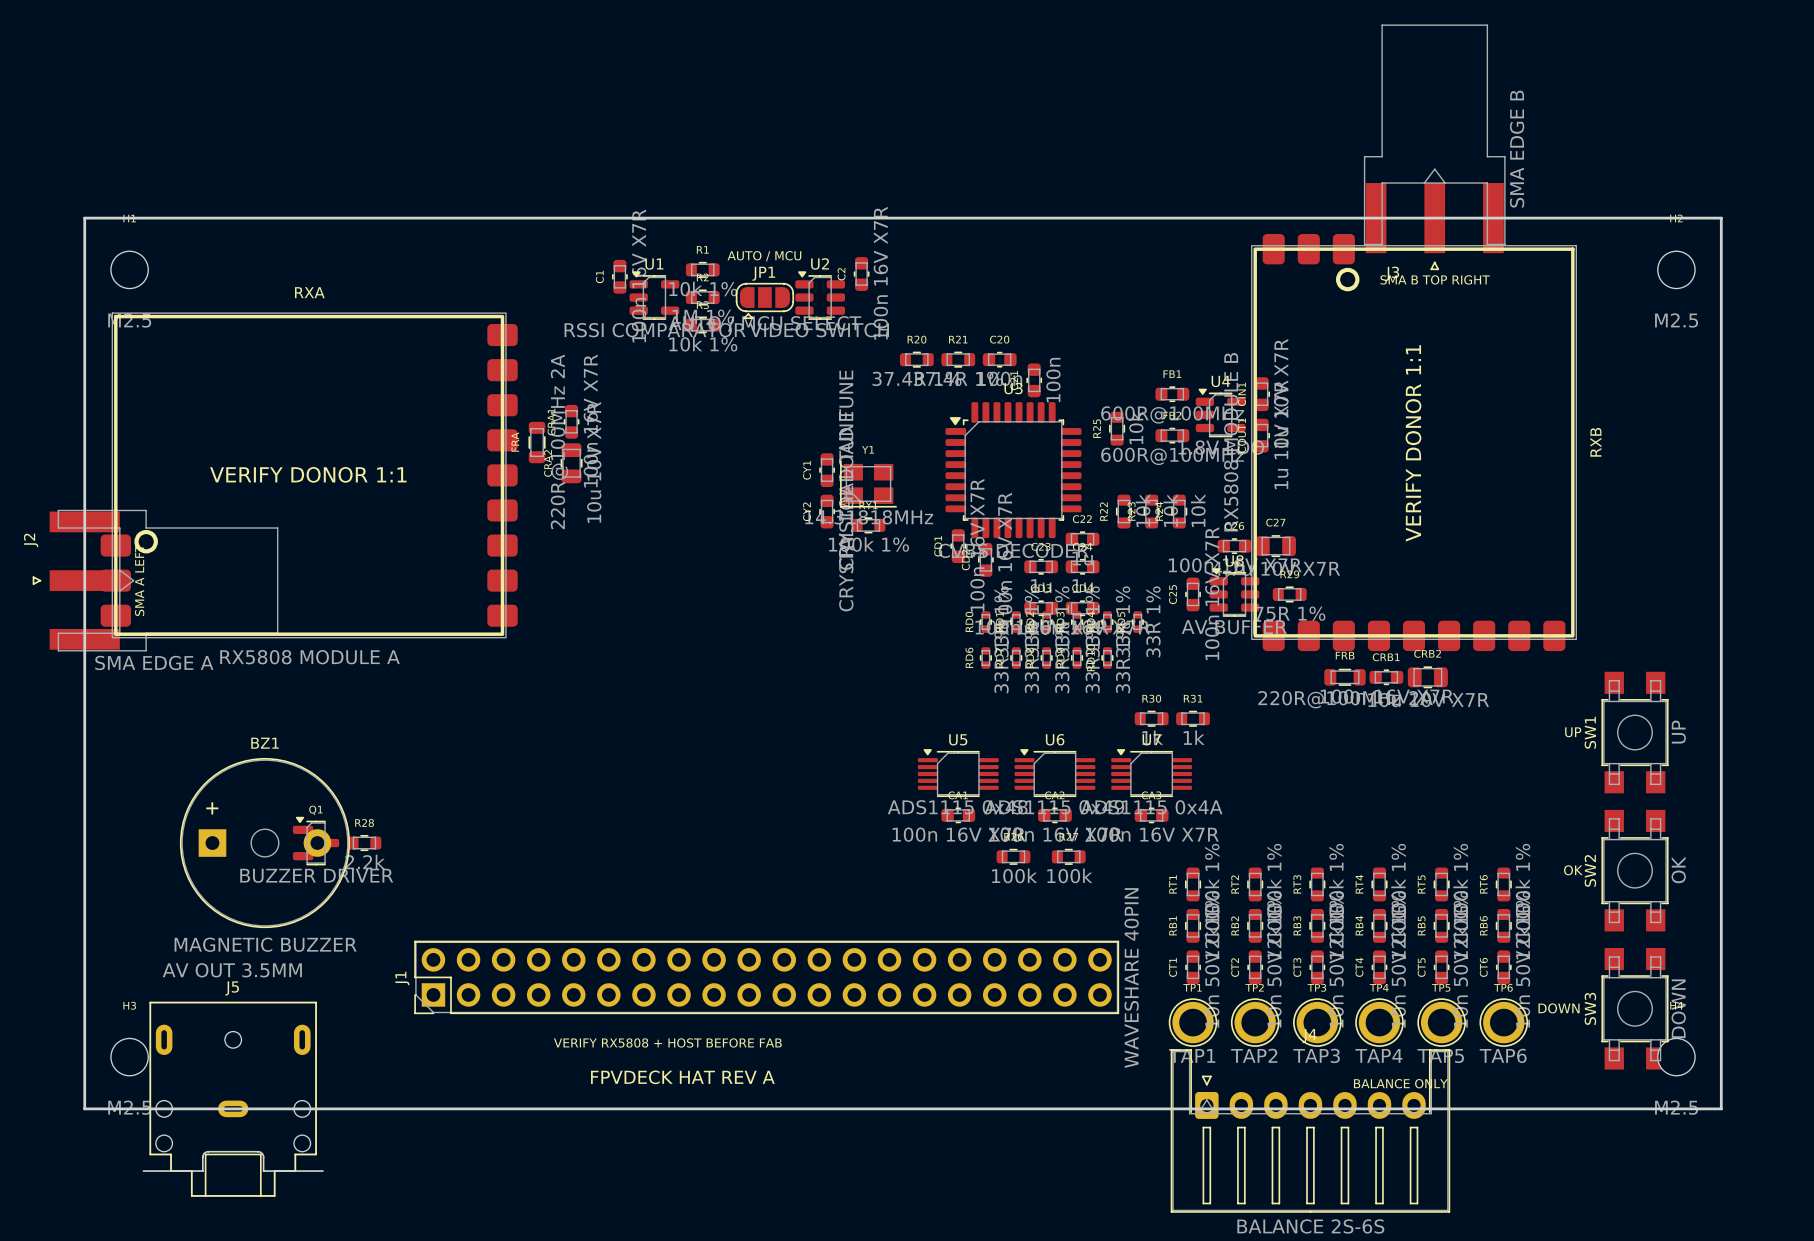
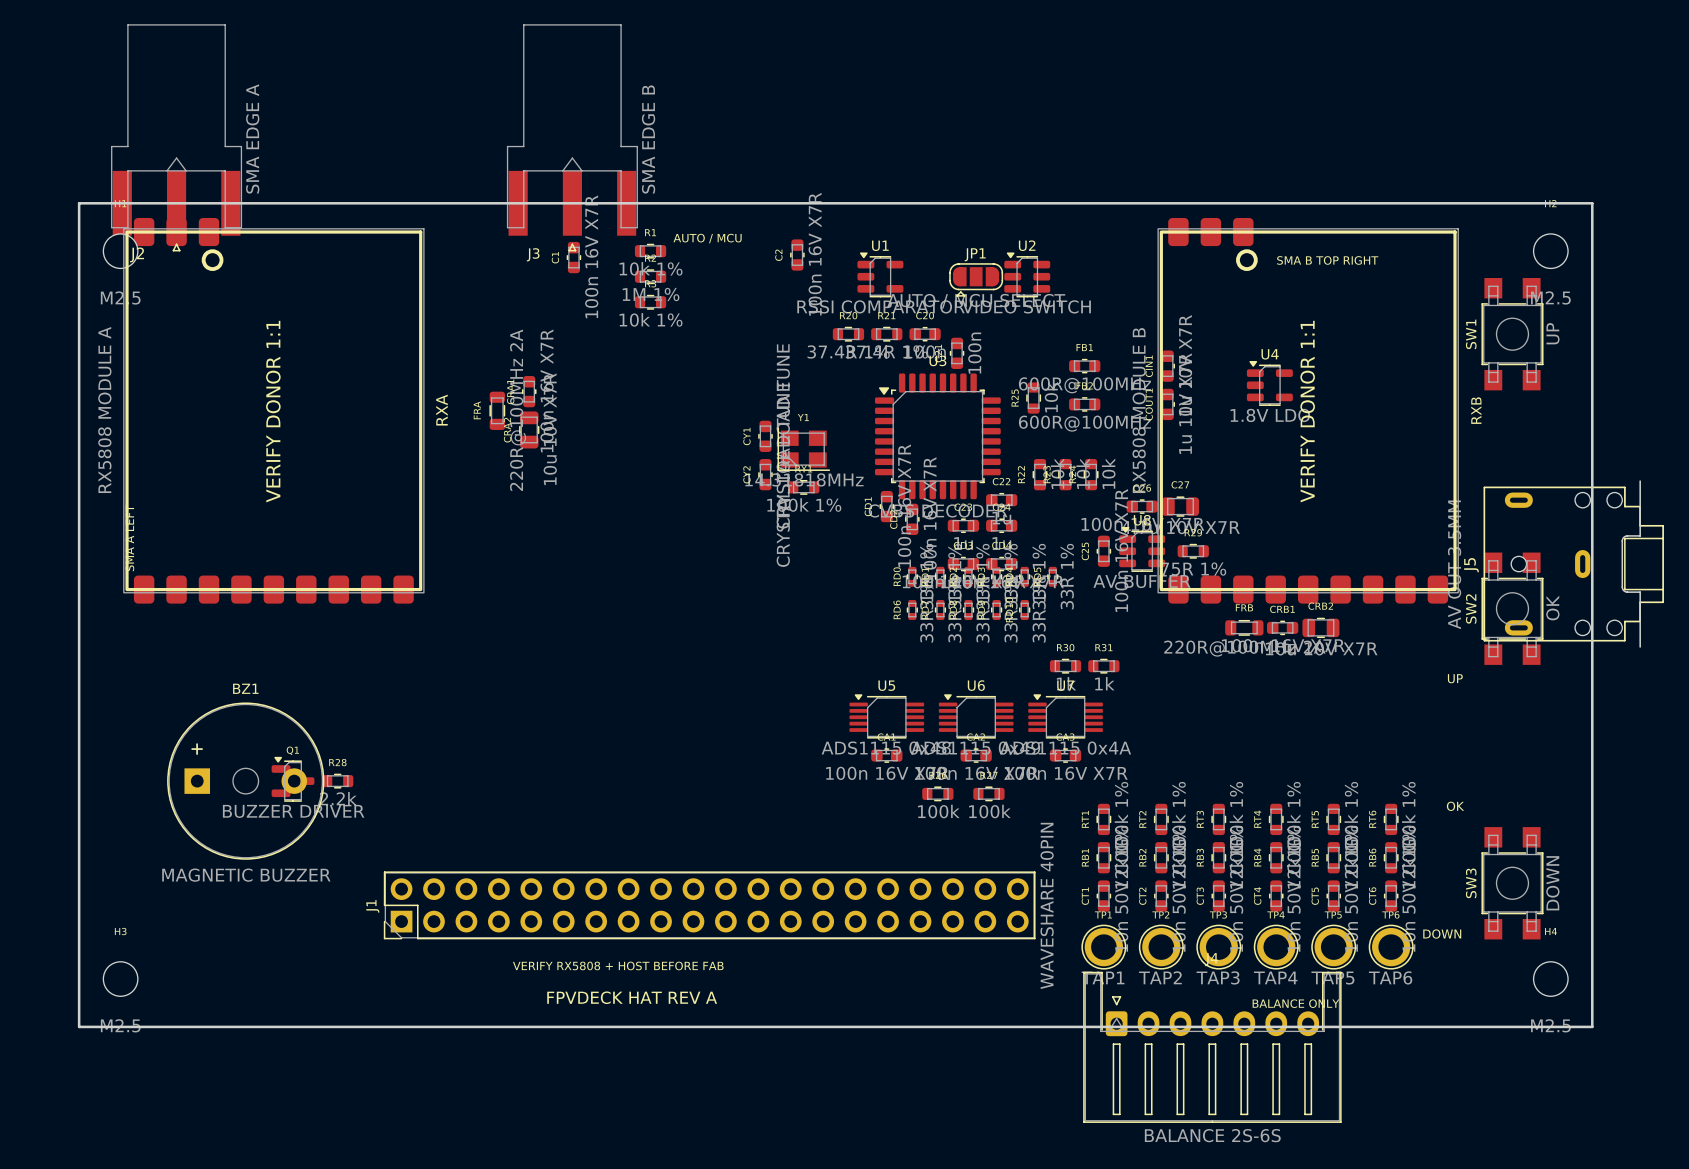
J3 position: (1434, 147) -> (572, 137)
U1 position: (654, 295) -> (880, 274)
U2 position: (820, 295) -> (1027, 274)
JP1 position: (764, 300) -> (976, 279)
U4 position: (1220, 412) -> (1269, 383)
RXA rotation: 0° (309, 475) -> 90° clockwise (273, 410)
J2 rotation: 0° (155, 580) -> 90° counterclockwise (176, 137)
J2 position: (155, 580) -> (176, 137)
SW1 position: (1634, 732) -> (1512, 334)
SW2 position: (1634, 870) -> (1512, 608)
SW3 position: (1634, 1008) -> (1512, 883)
J5 rotation: 0° (233, 1099) -> 90° counterclockwise (1573, 564)
J5 position: (233, 1099) -> (1573, 564)

